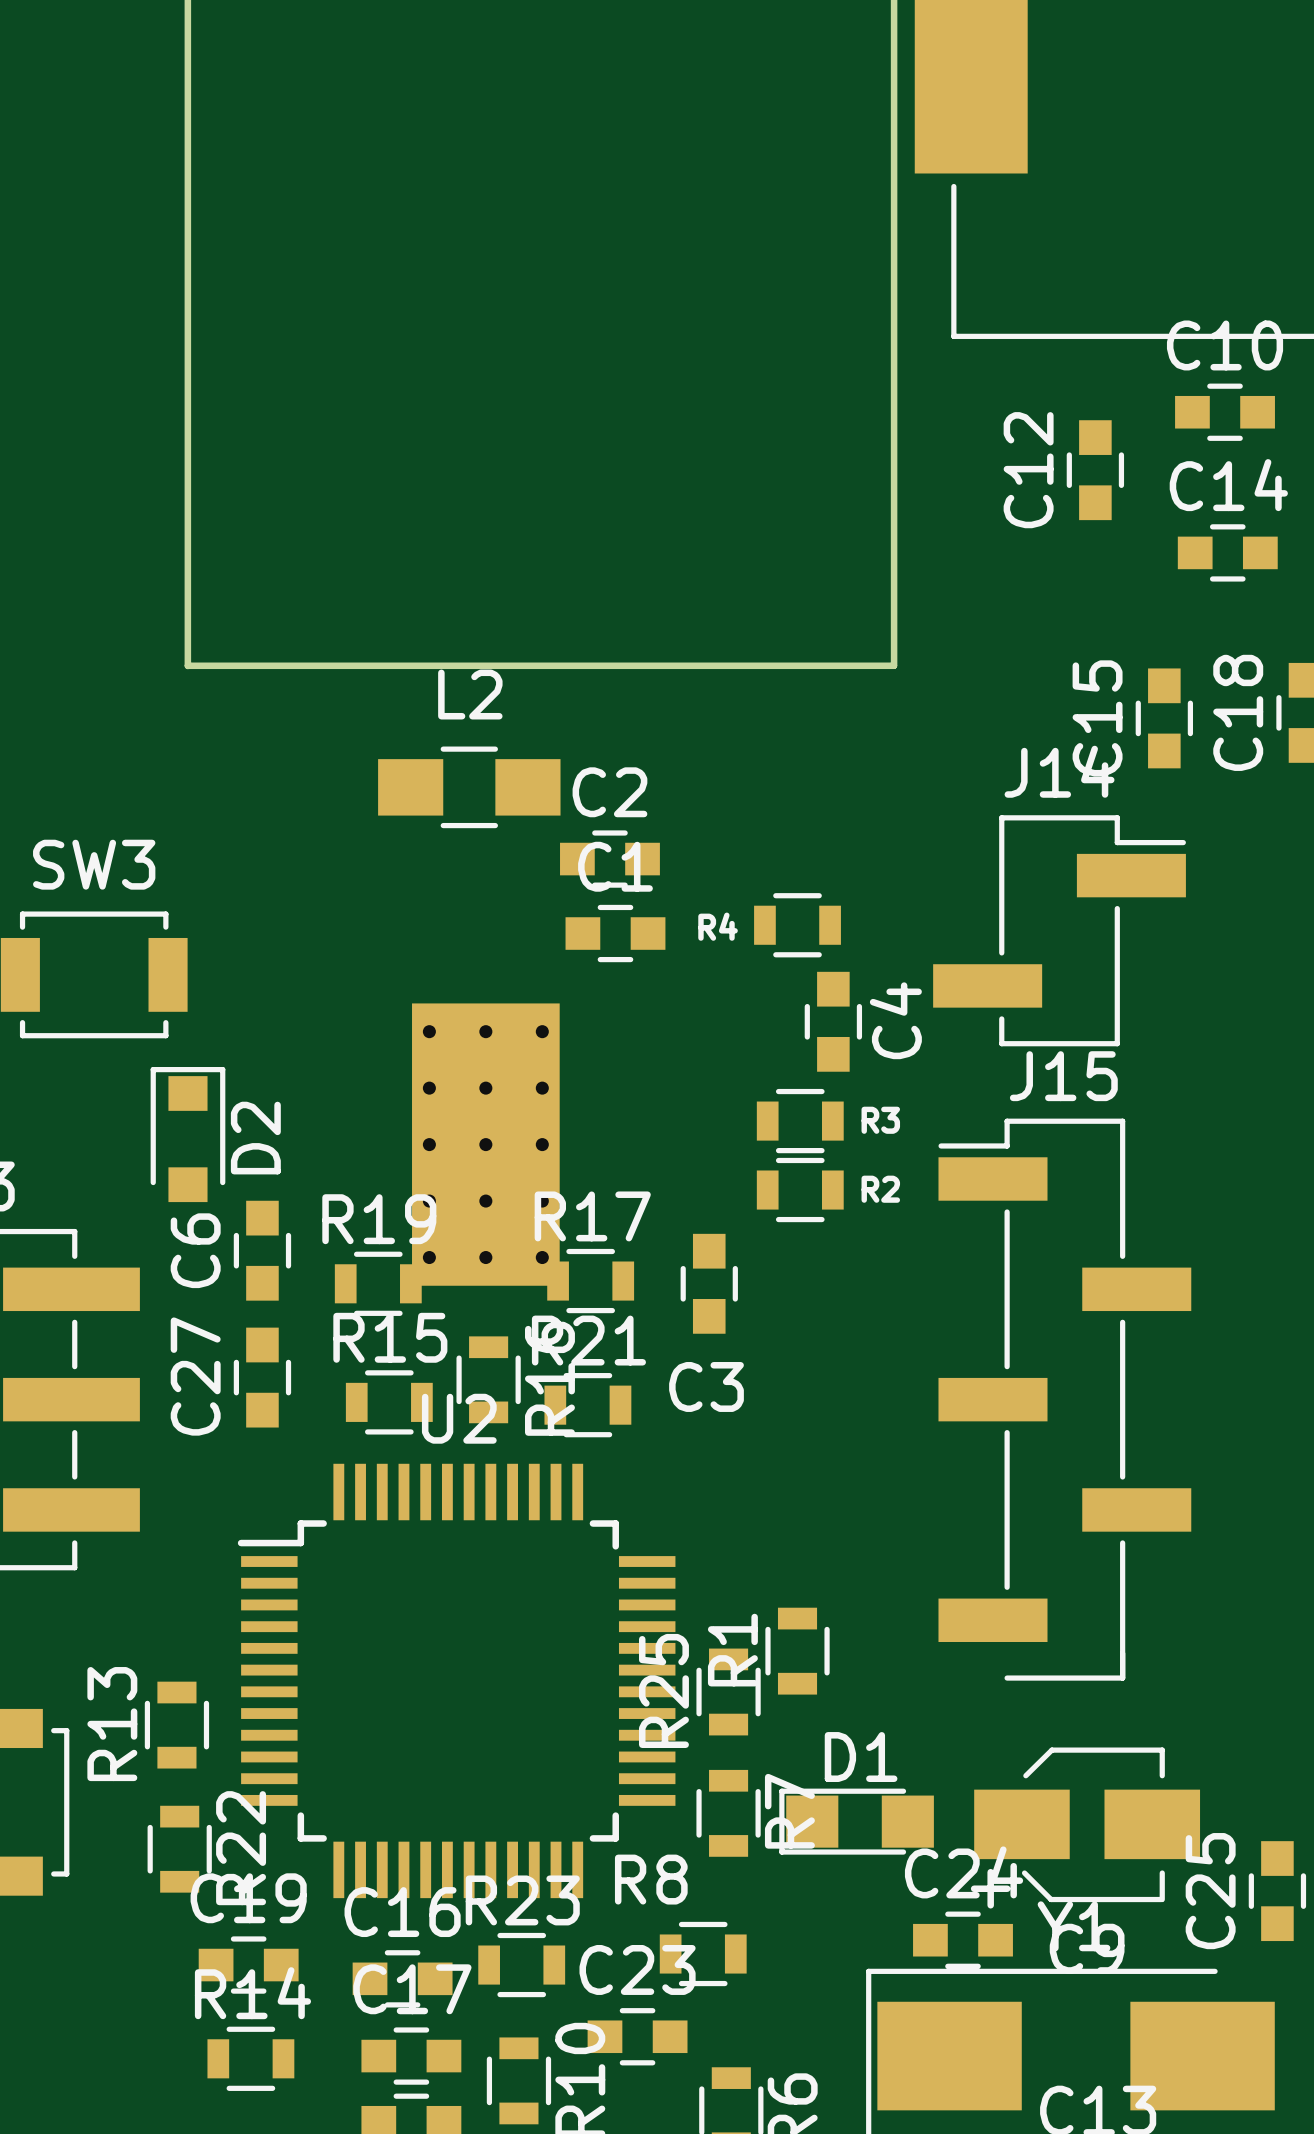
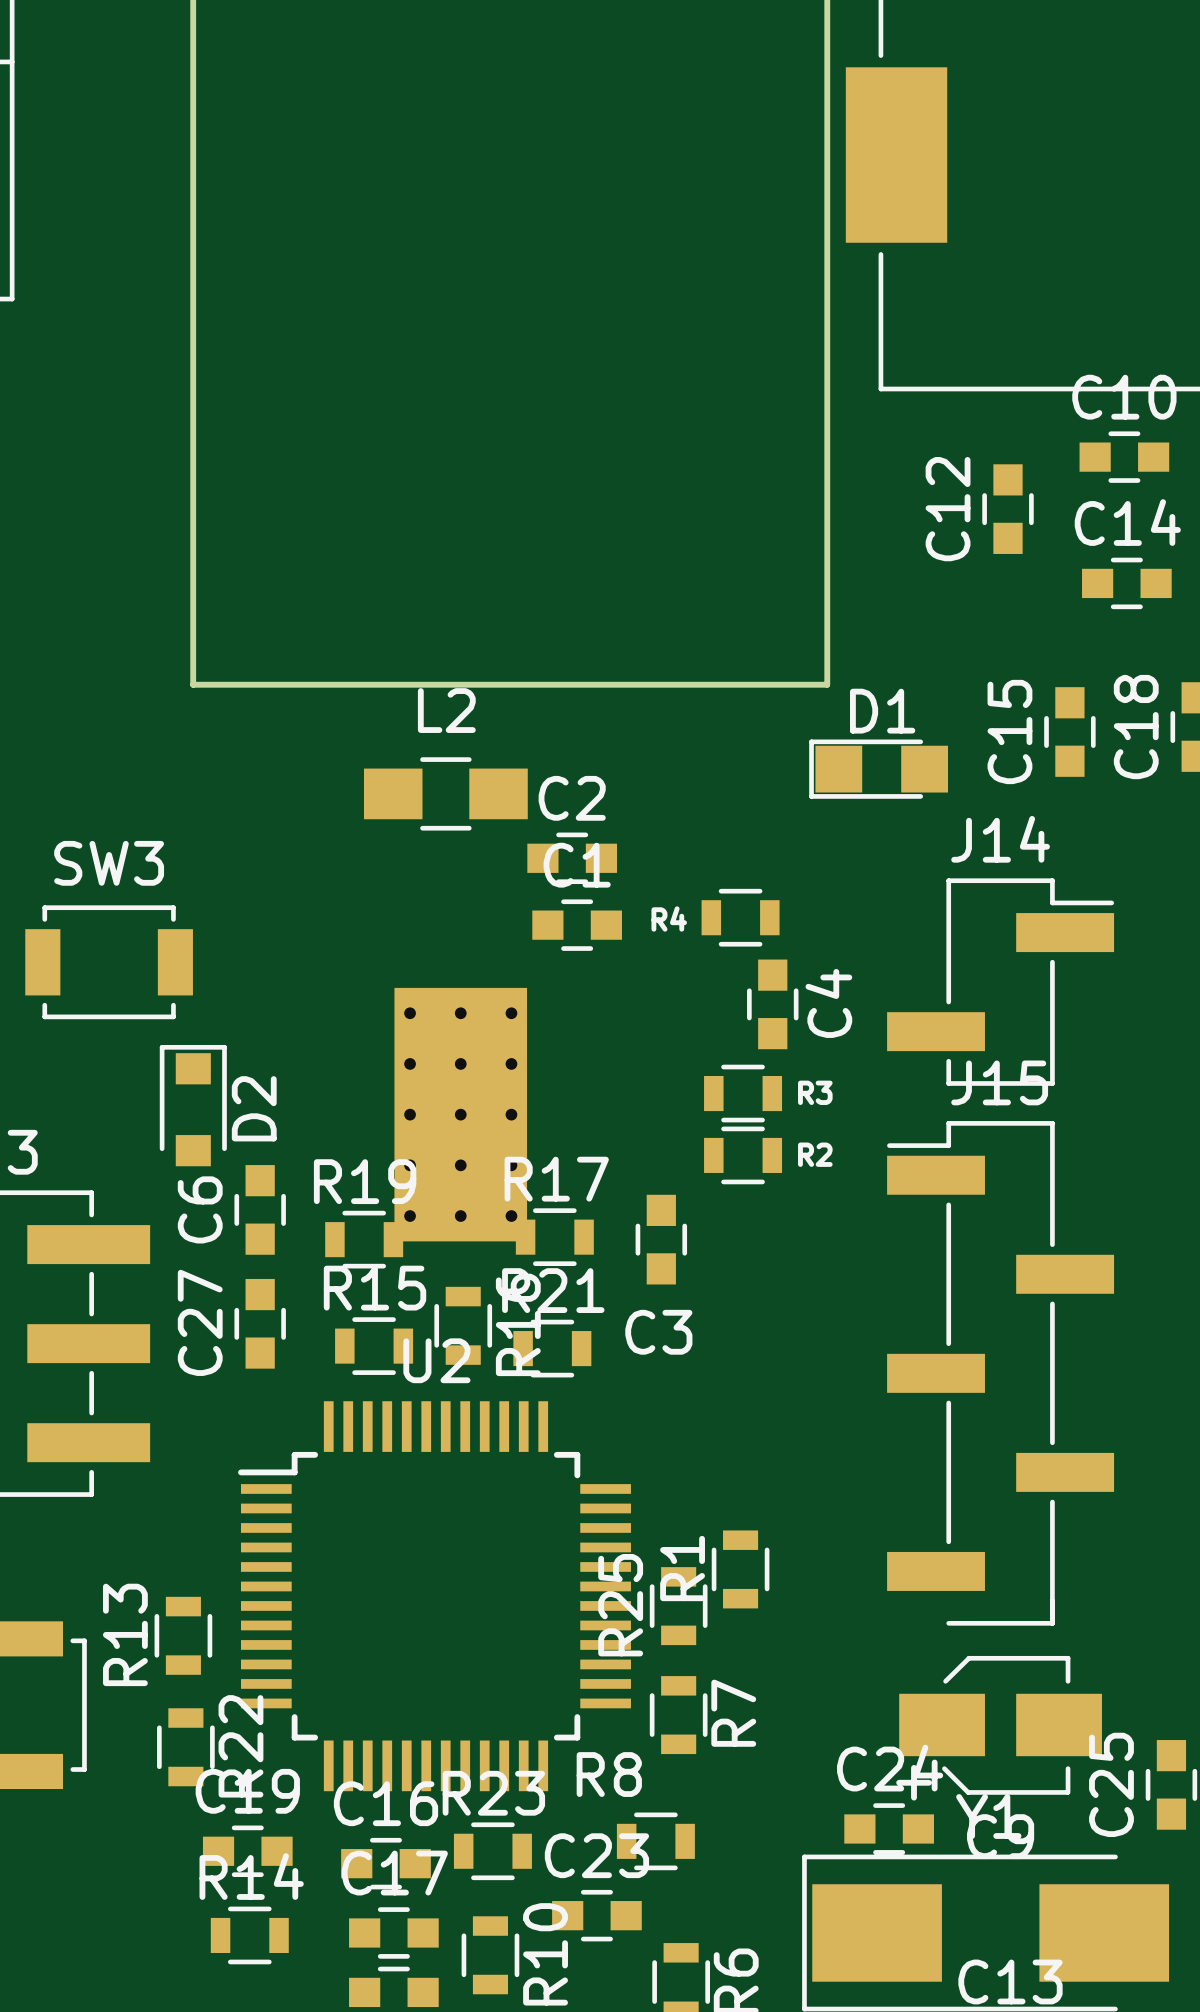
J14 position: (1059, 930) -> (1000, 982)
J15 position: (1064, 1399) -> (1000, 1373)
D1 position: (856, 1821) -> (878, 769)

